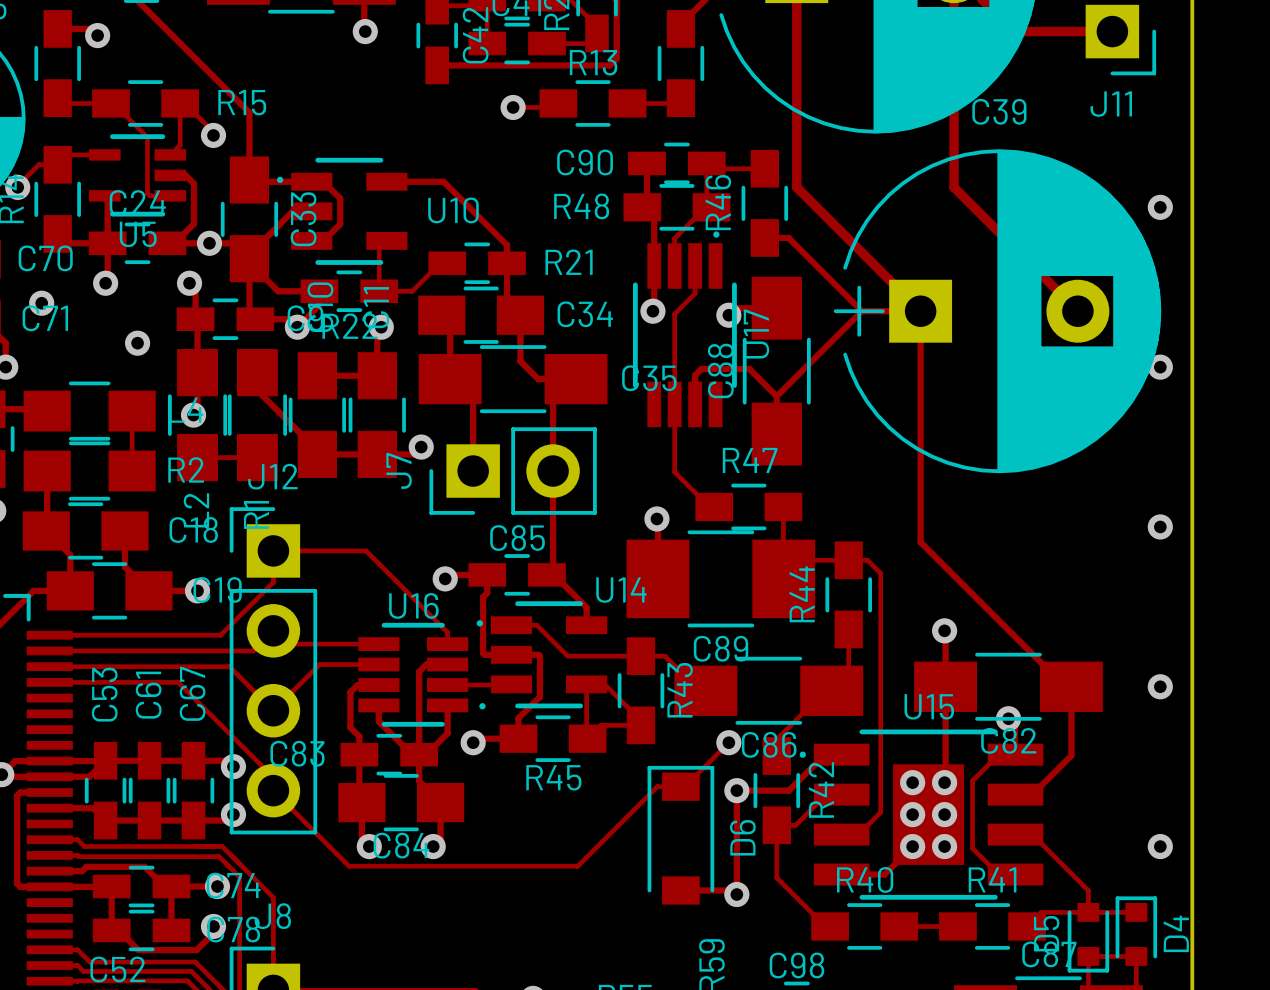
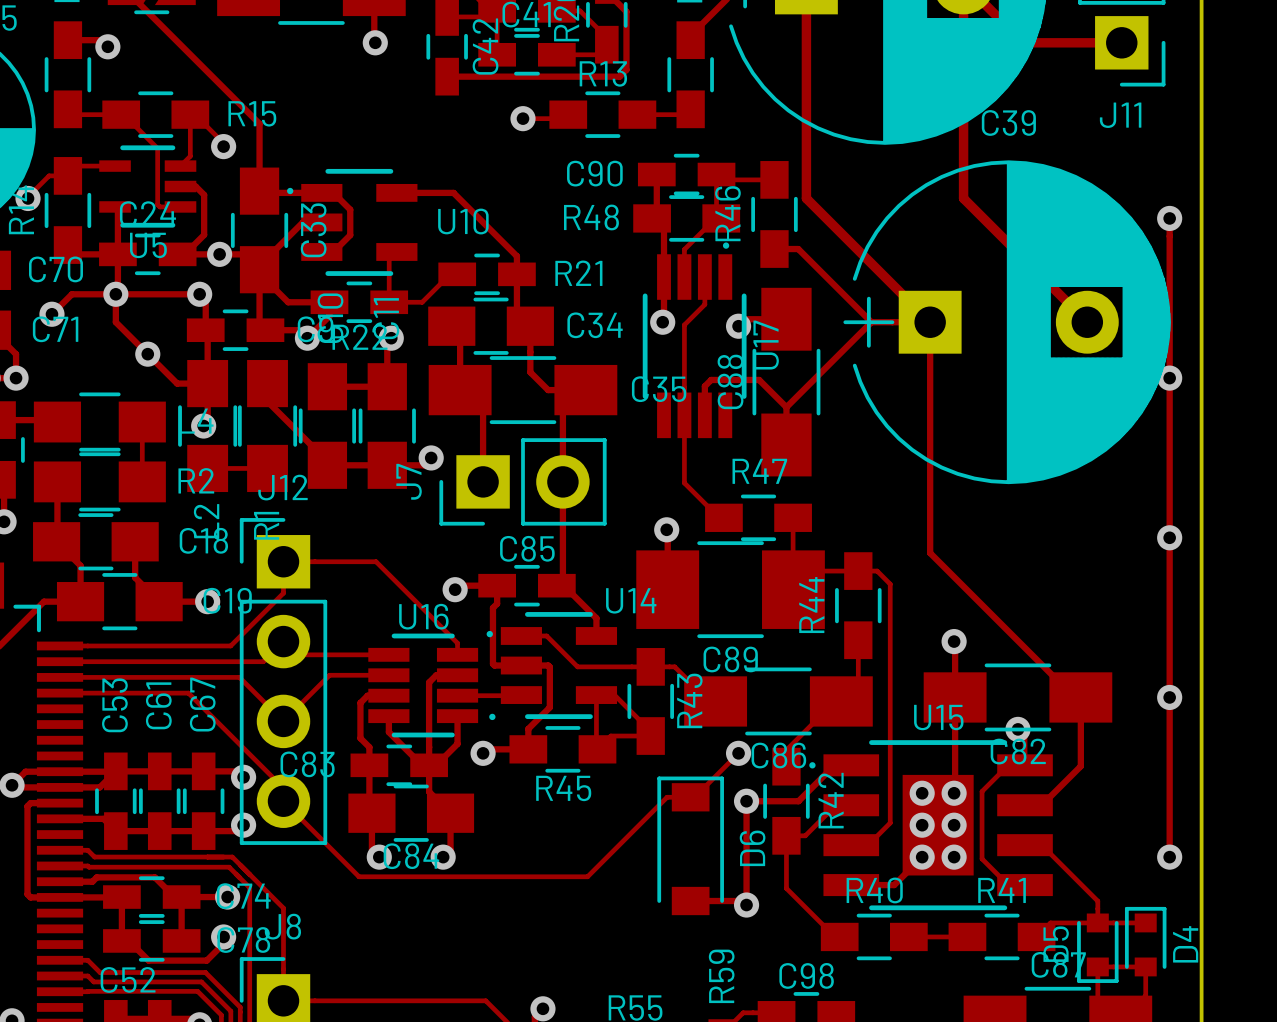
track: none -> (1169, 218) (1169, 857)
track: none -> (115, 294) (115, 322) (177, 383) (207, 383)
track: none -> (199, 294) (71, 294) (51, 314)

